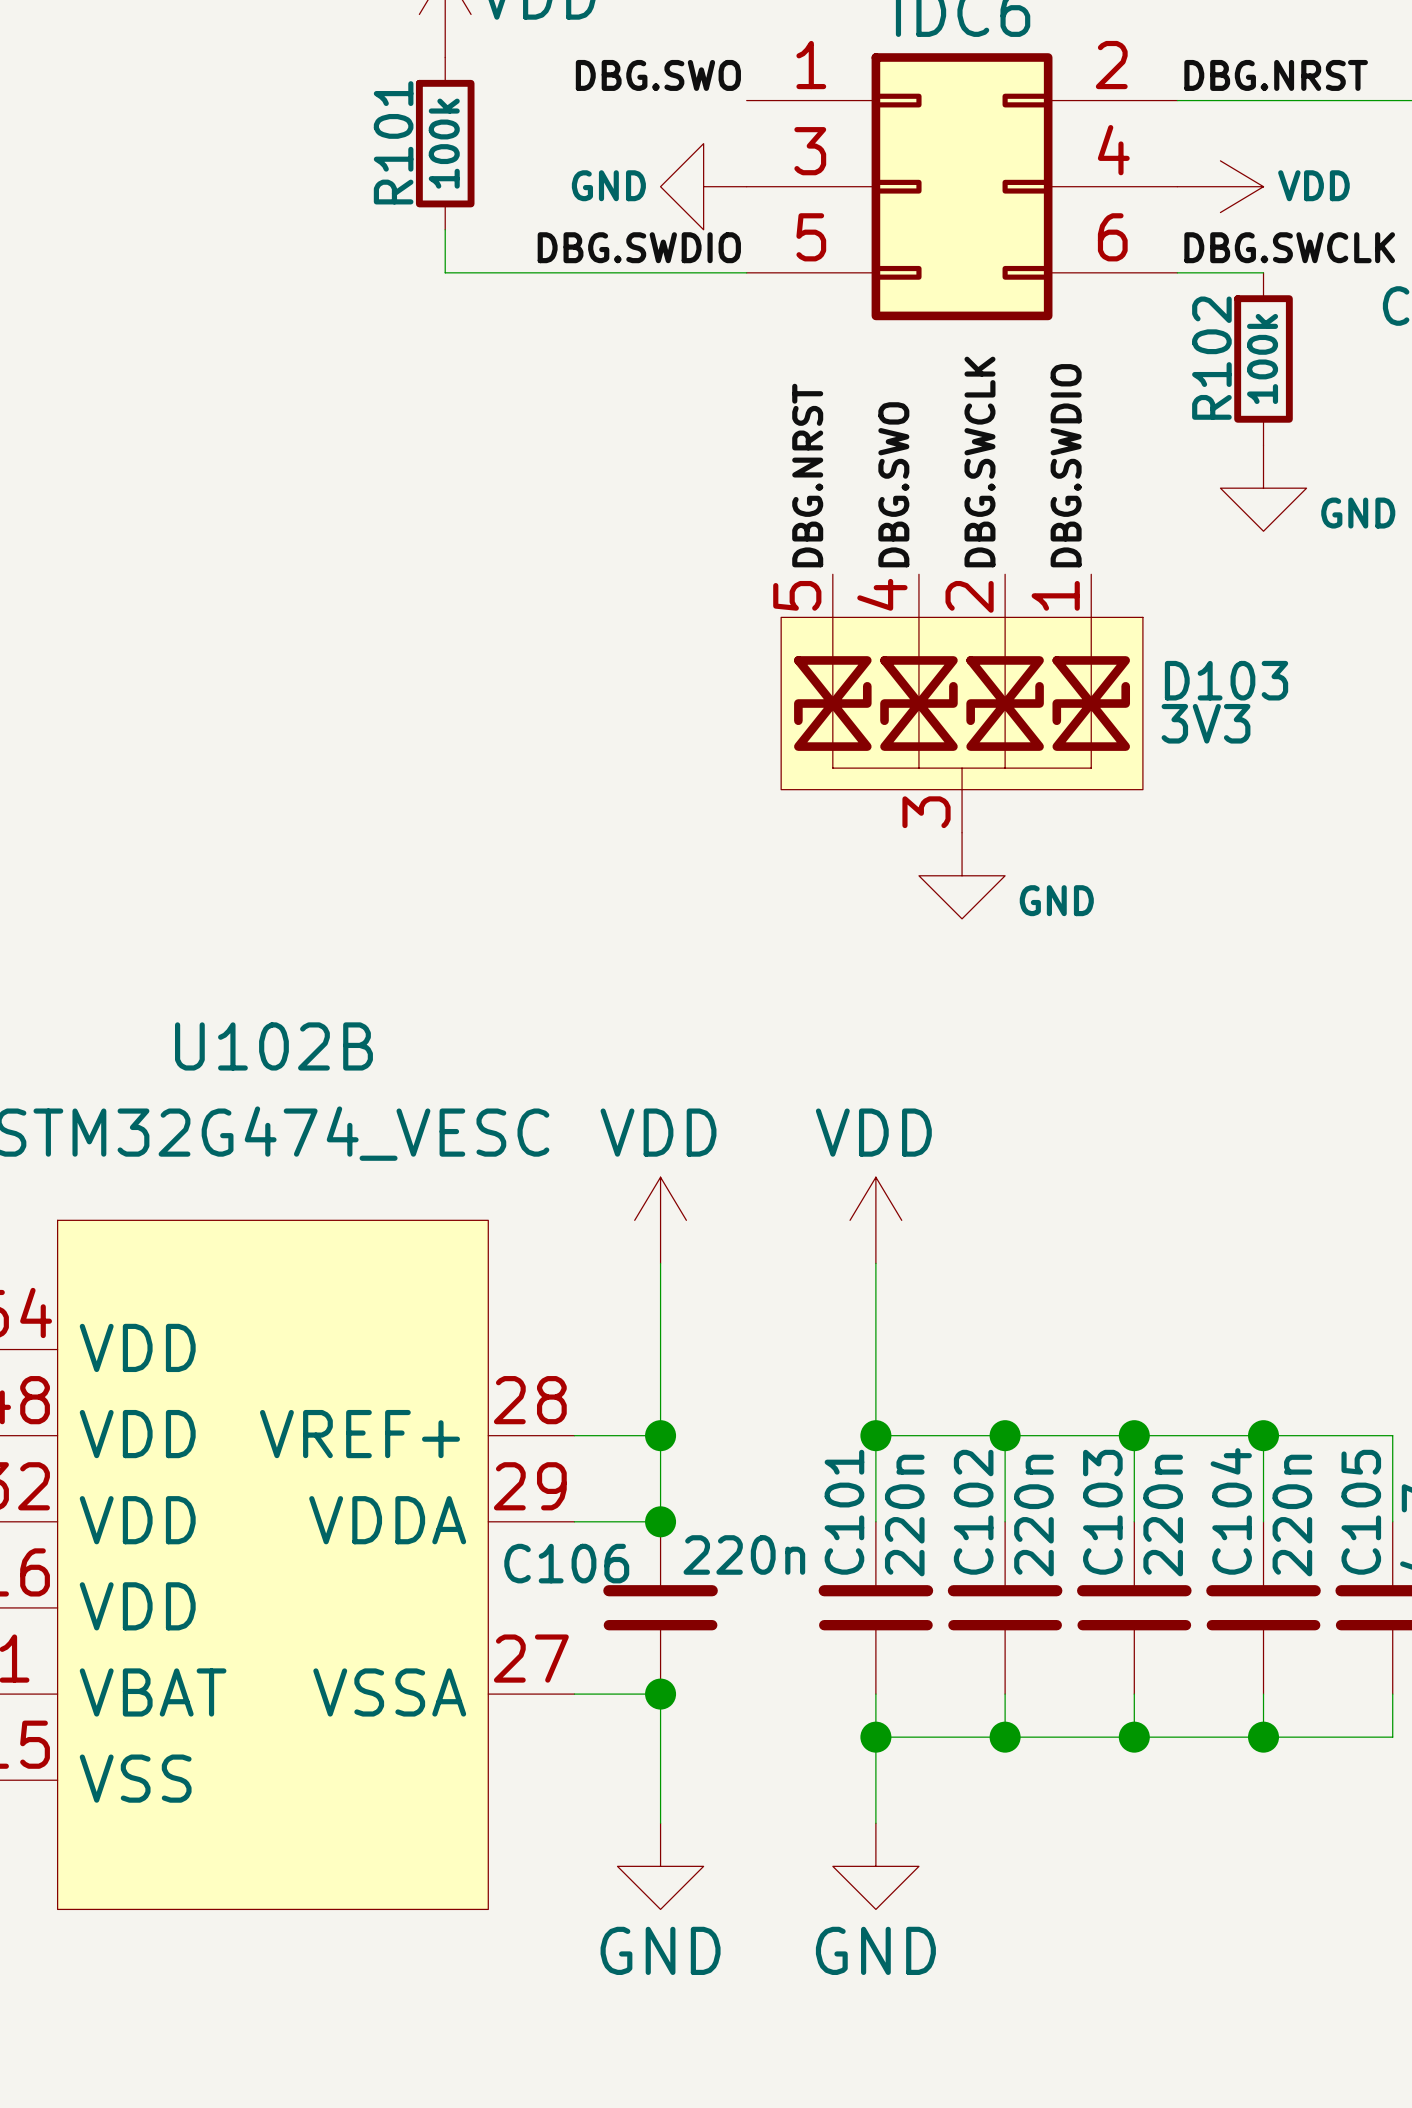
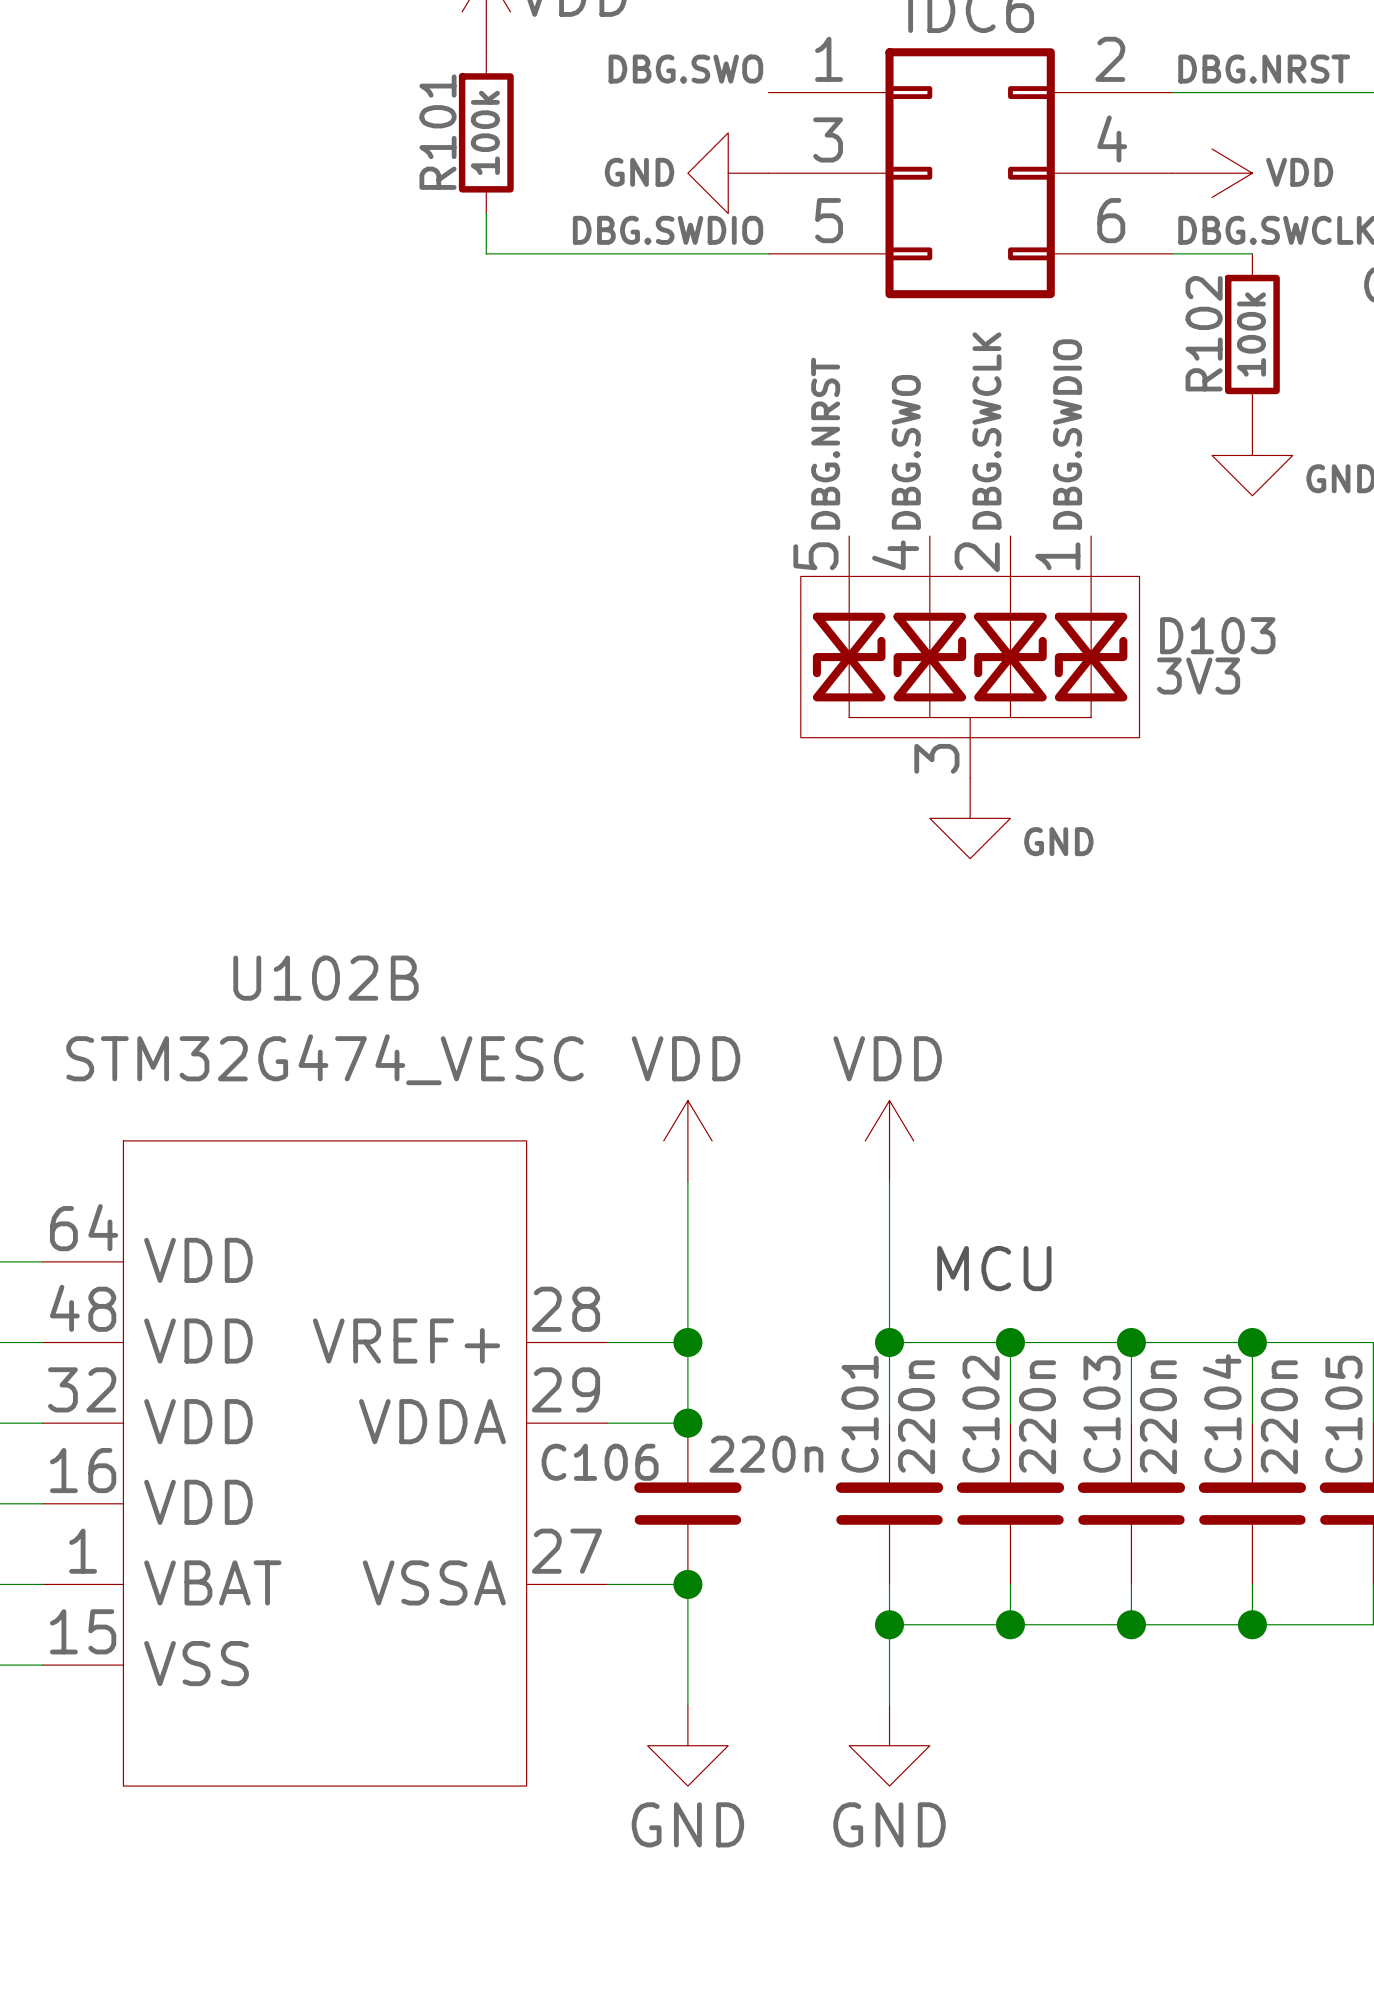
text: none -> MCU (994, 1268)

